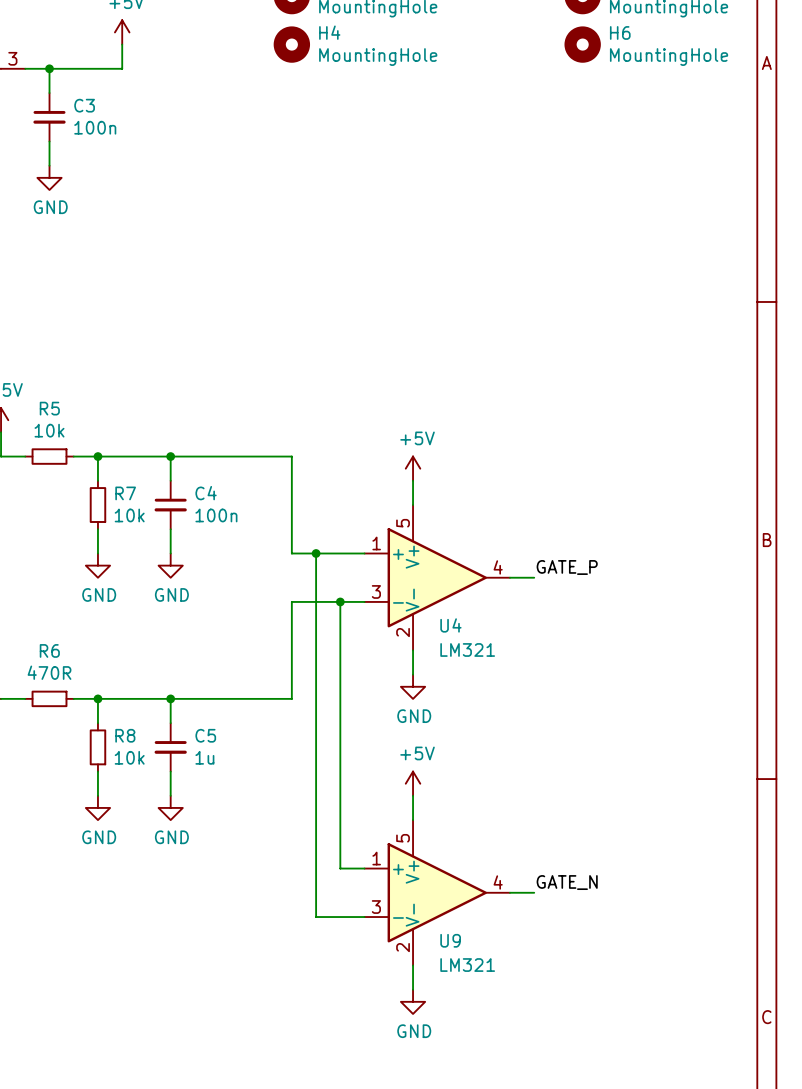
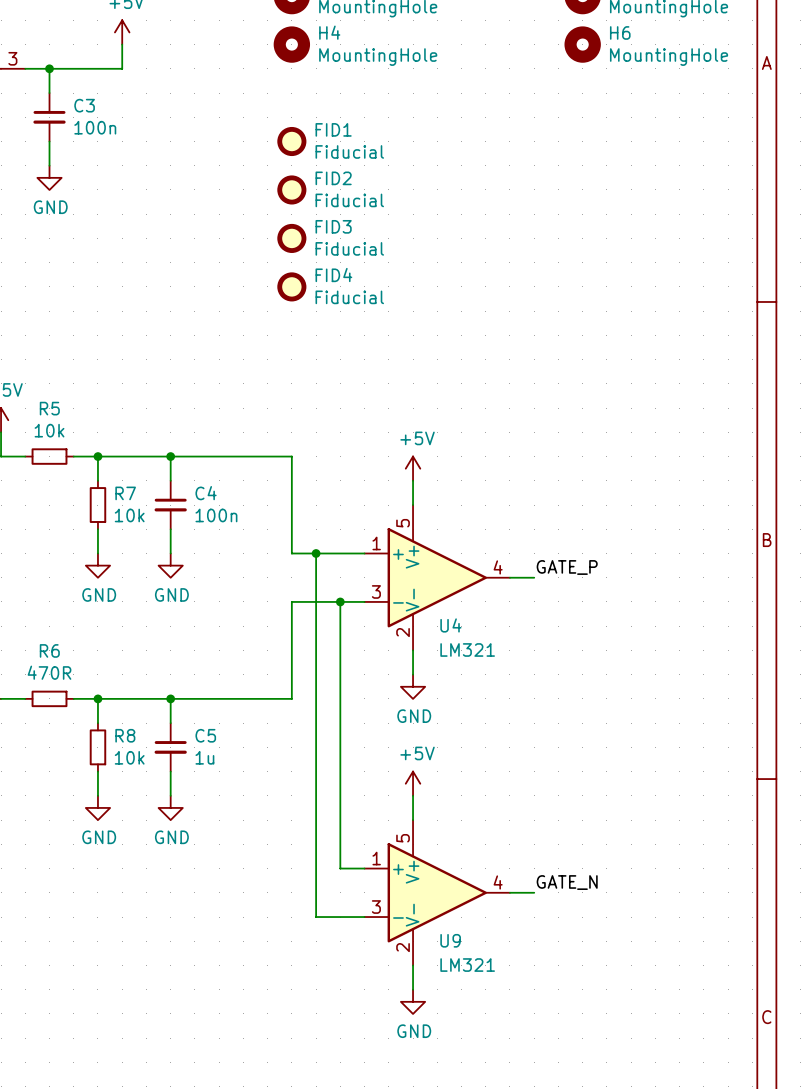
FID1: none -> Fiducial (291, 141)
FID2: none -> Fiducial (291, 189)
FID3: none -> Fiducial (291, 238)
FID4: none -> Fiducial (291, 286)

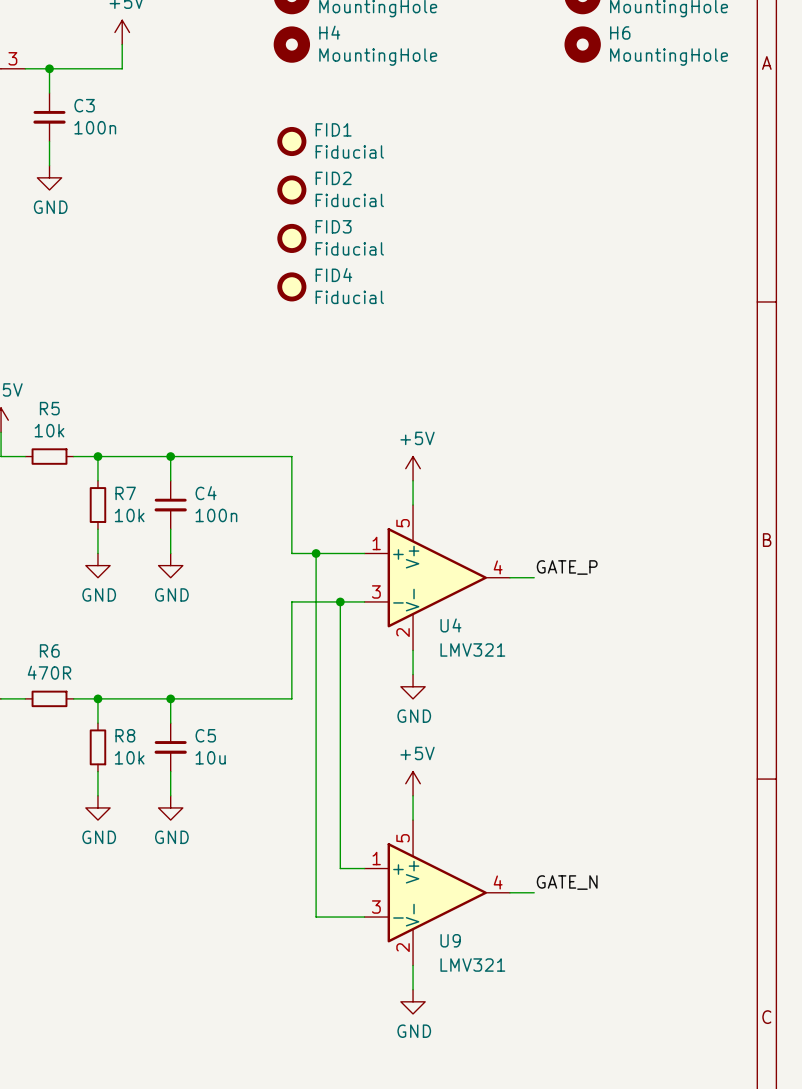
U4 value: LM321 (467, 649) -> LMV321 (472, 649)
C5 value: 1u (204, 757) -> 10u (210, 757)
U9 value: LM321 (467, 965) -> LMV321 (472, 965)

